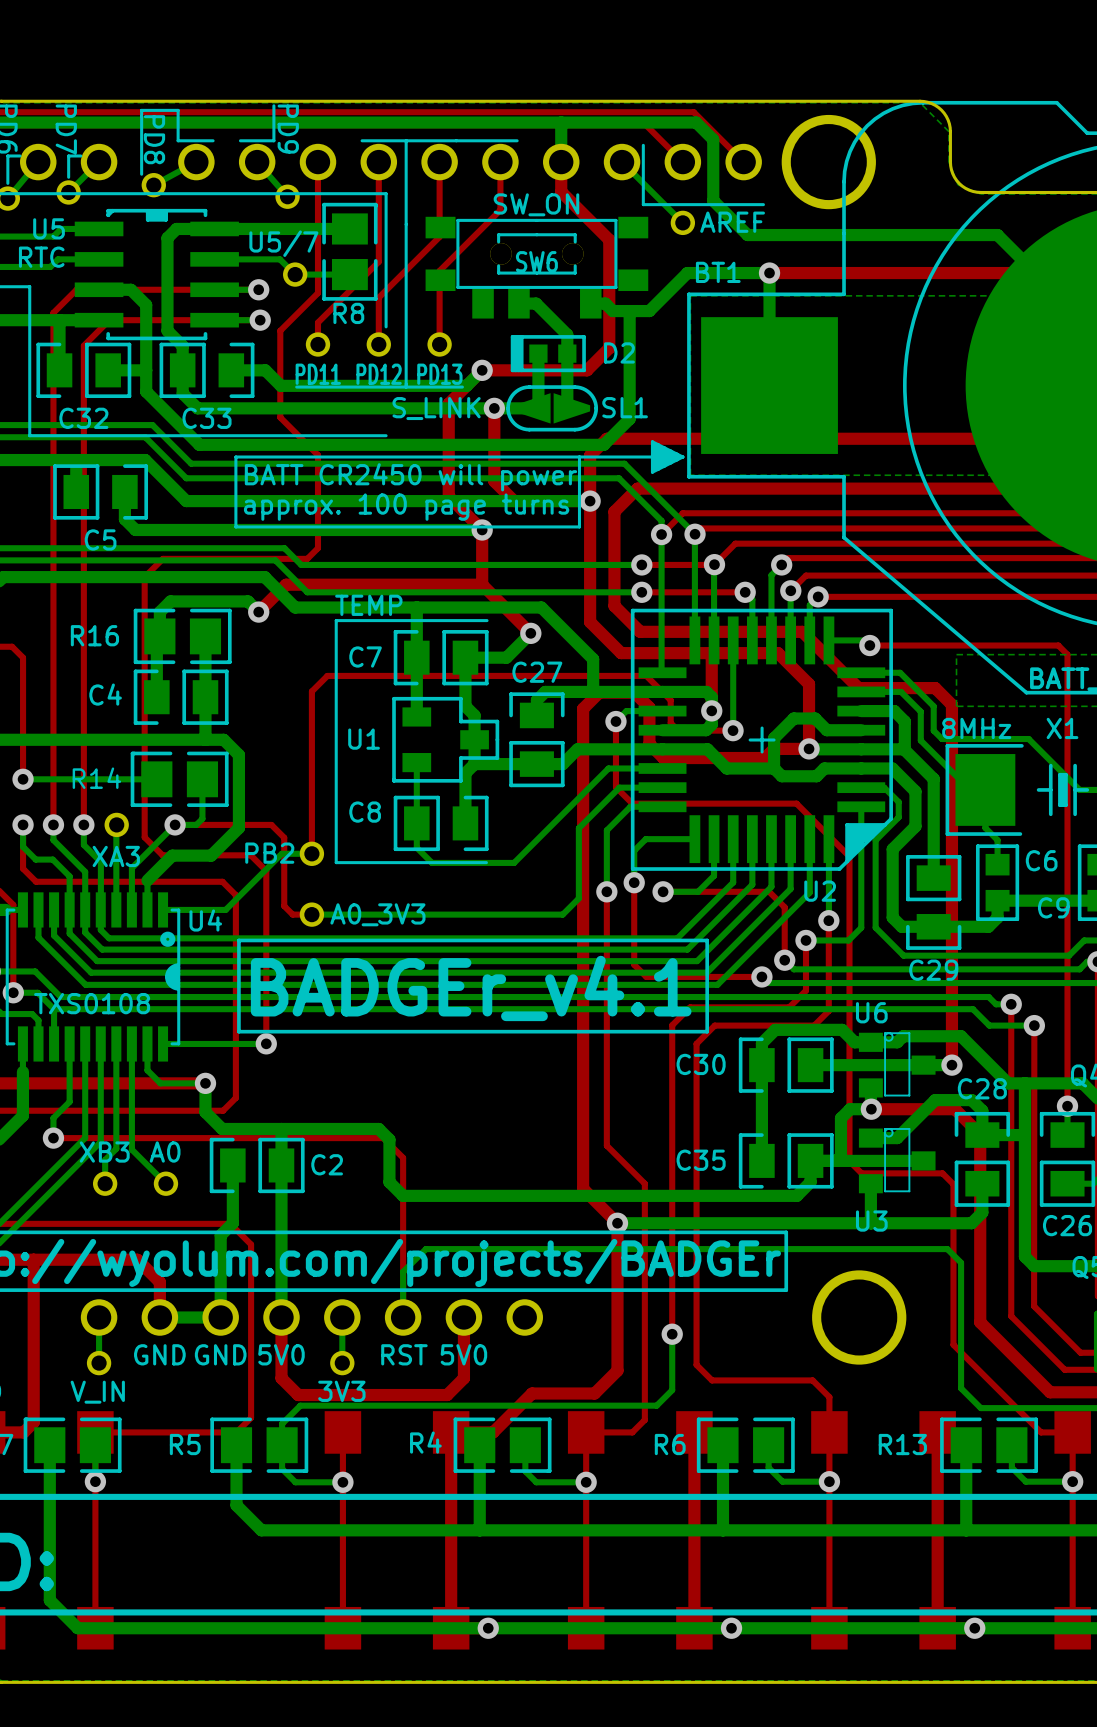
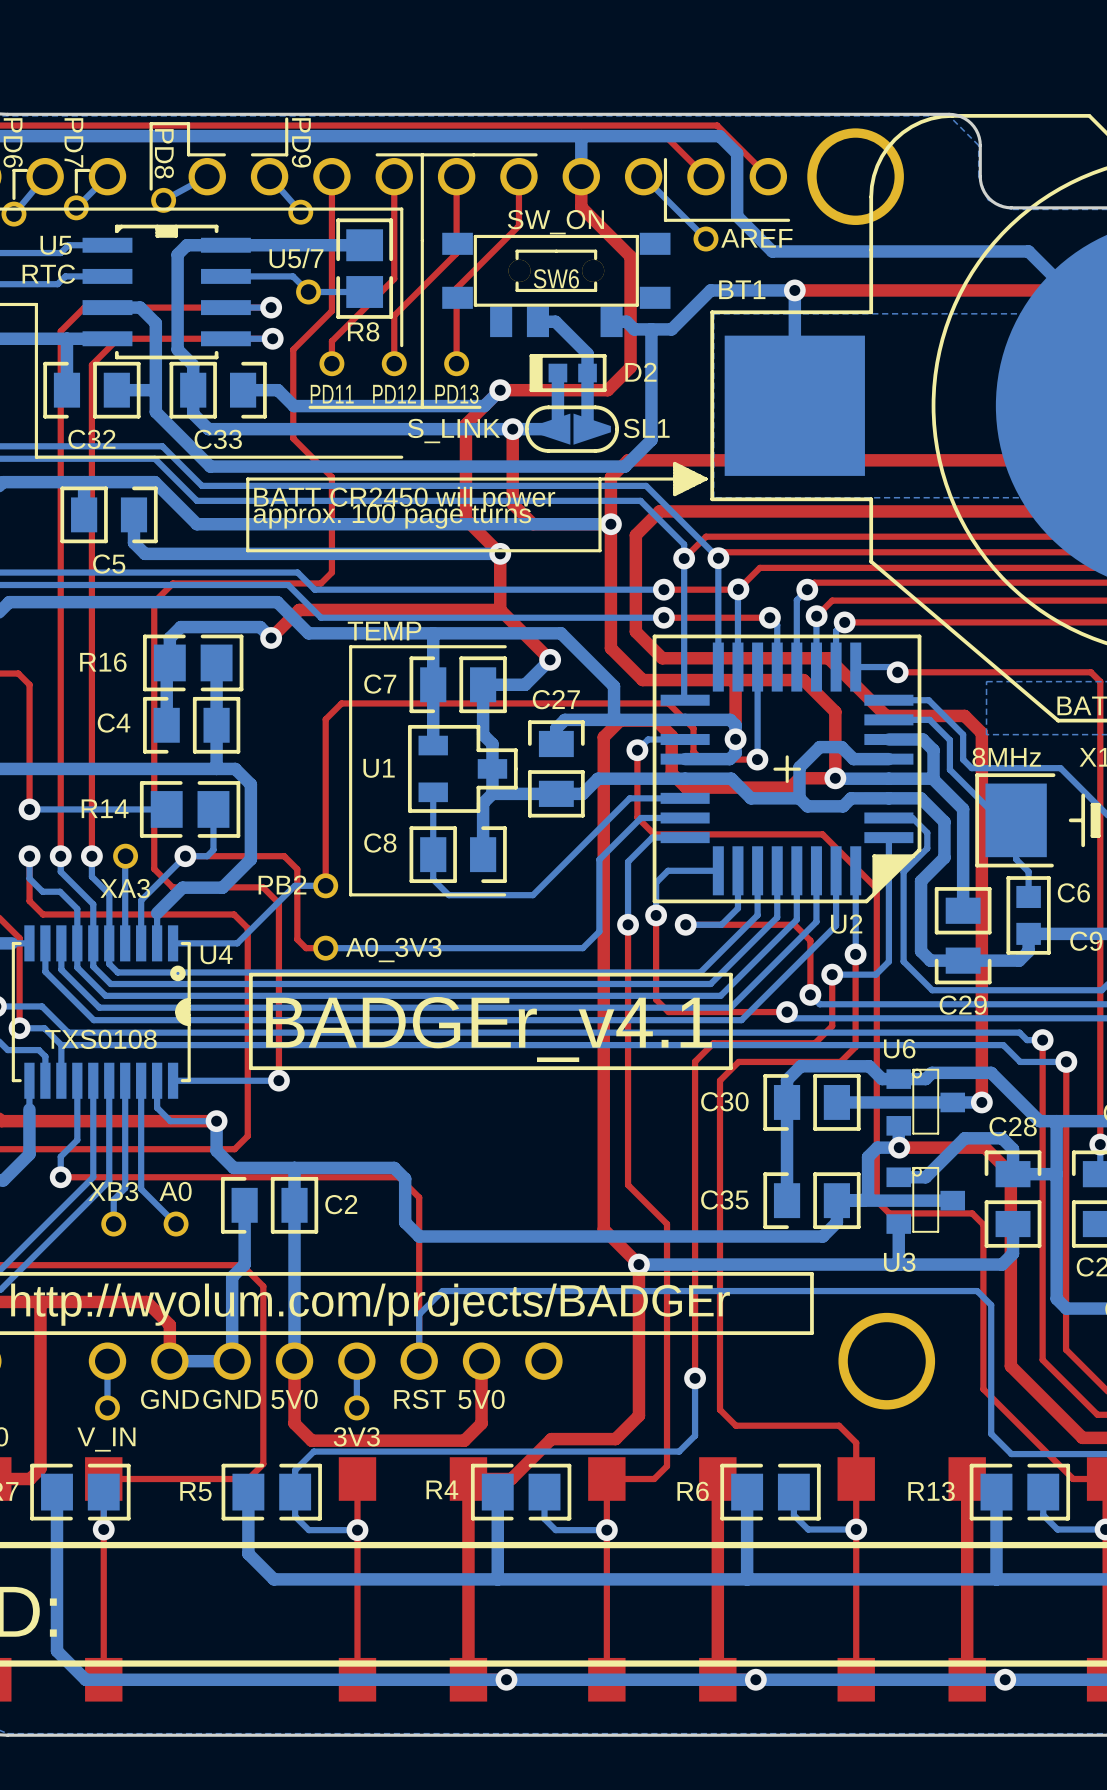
text position: approx. 100 page turns (406, 507) -> approx. 100 page turns (392, 516)

